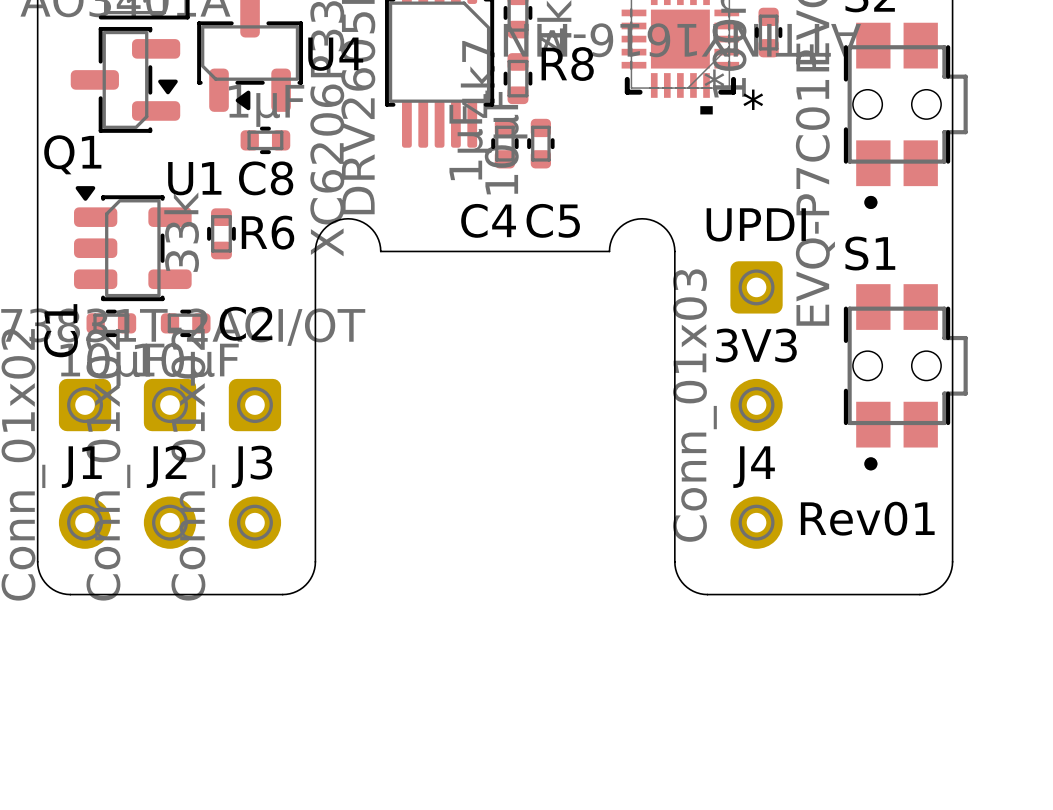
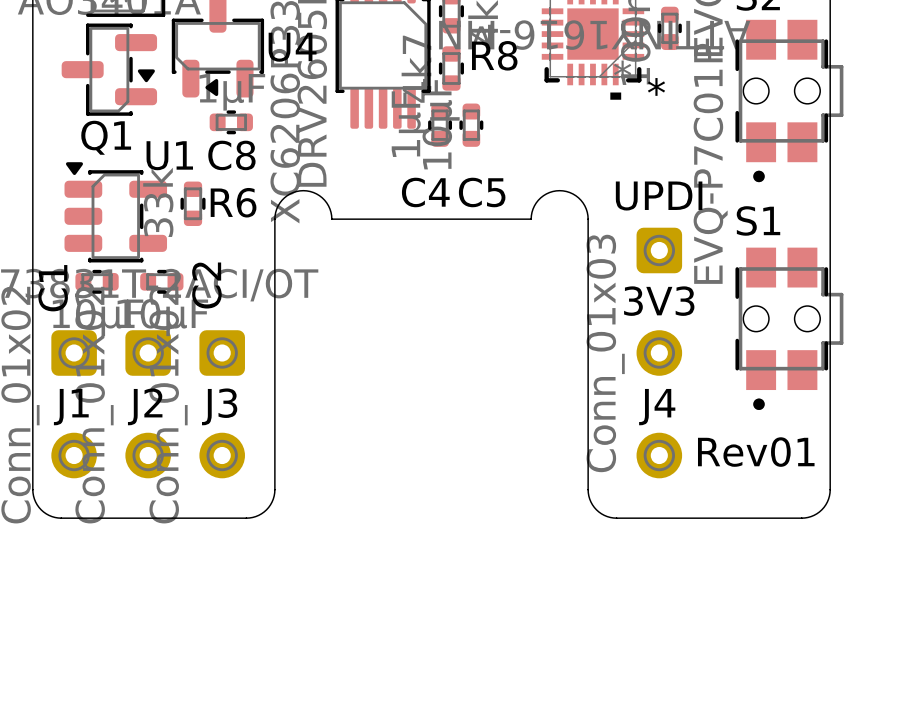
Q1 name position: Q1 (72, 154) -> Q1 (106, 137)
C2 name rotation: 0° (245, 323) -> 90° counterclockwise (206, 285)

